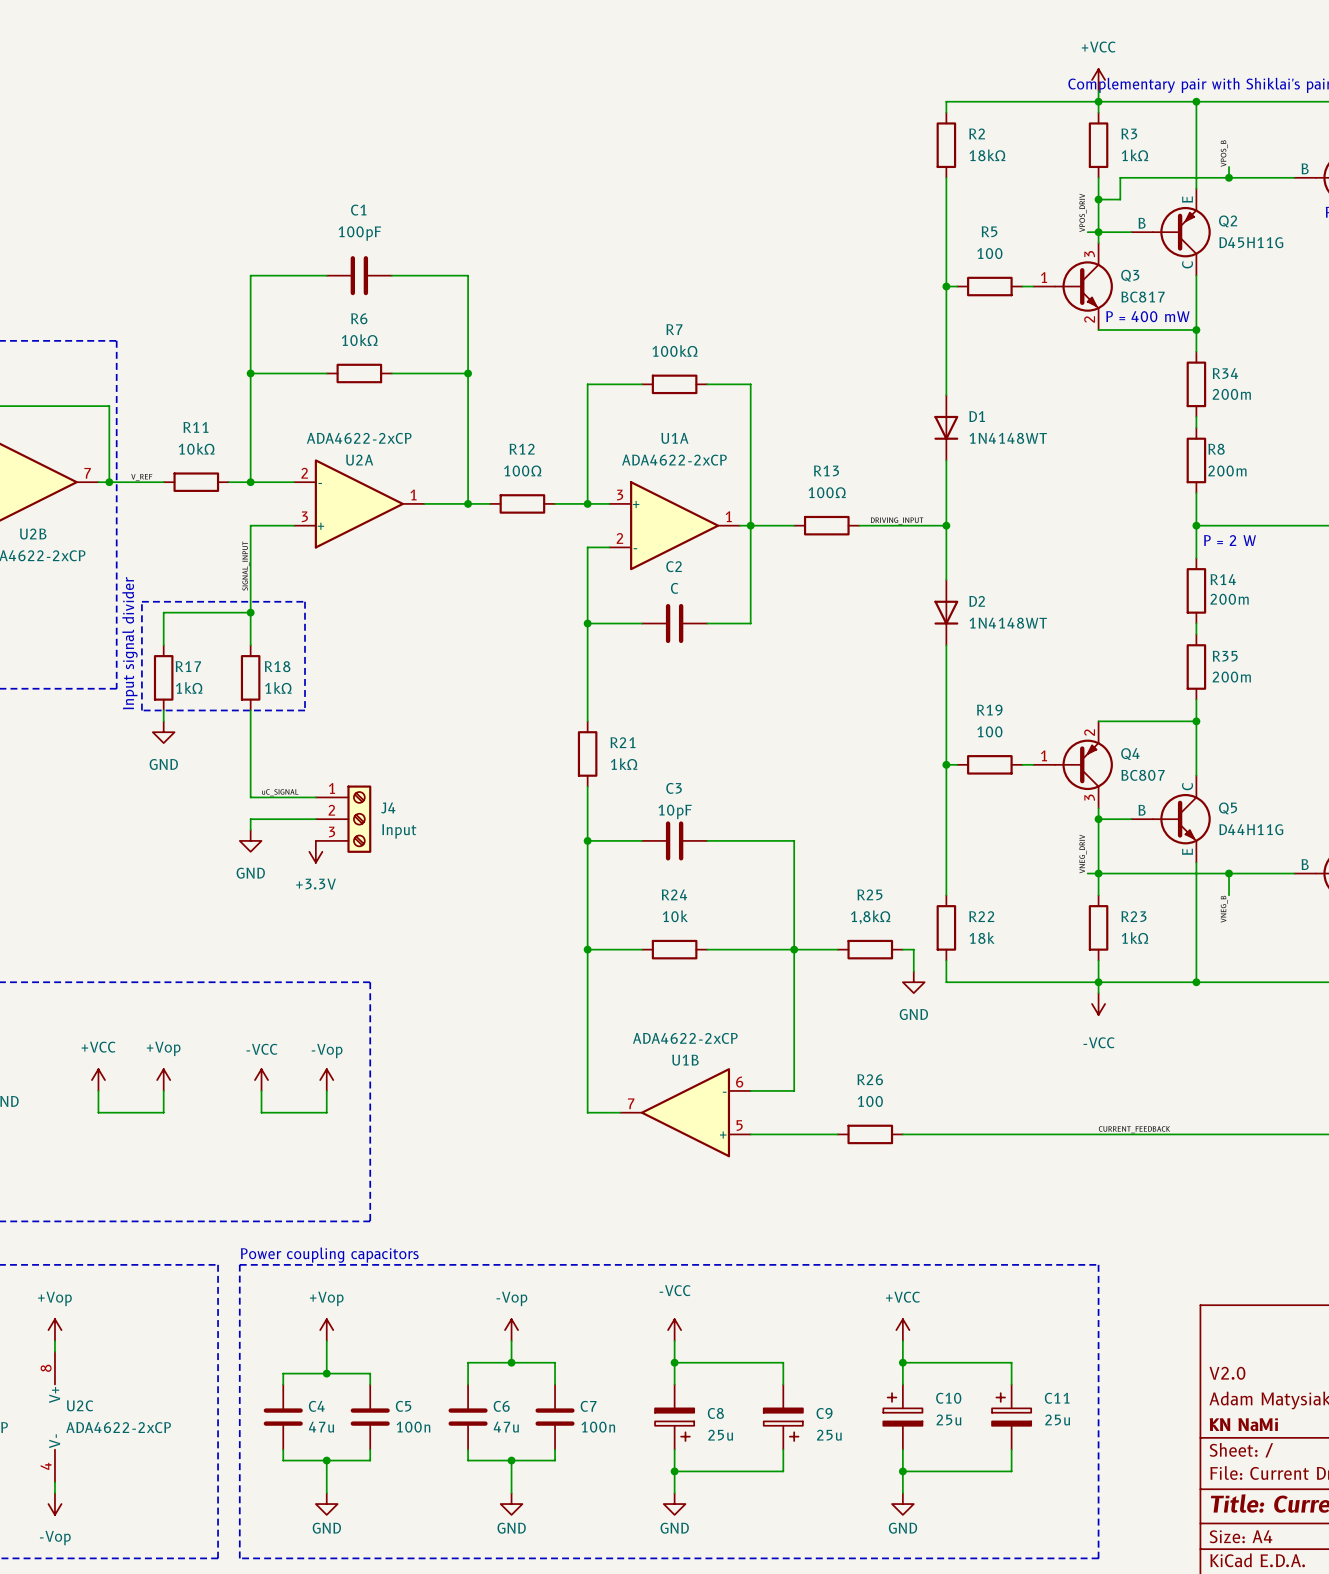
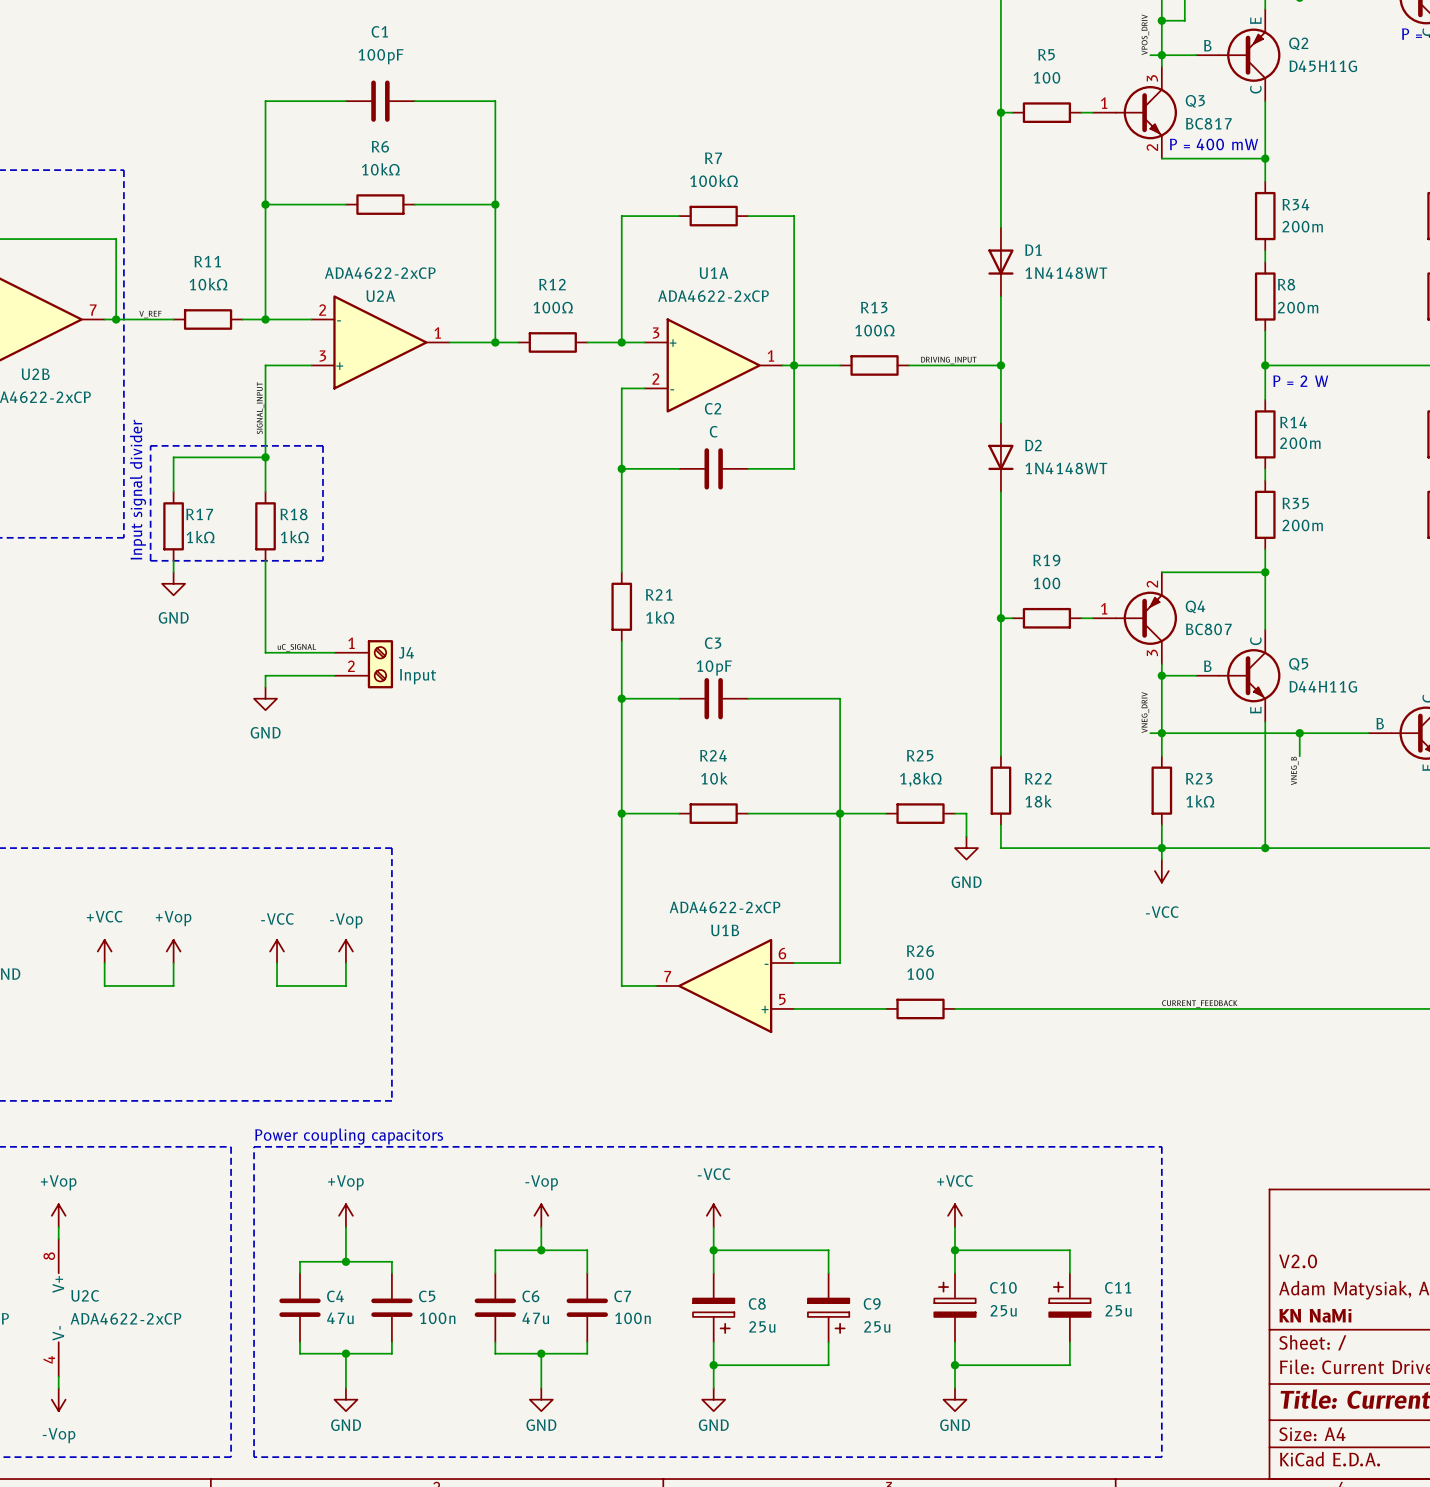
J4 symbol: [315, 785, 372, 853] -> [334, 640, 394, 689]
power symbol: +3.3V (315, 851) -> none

